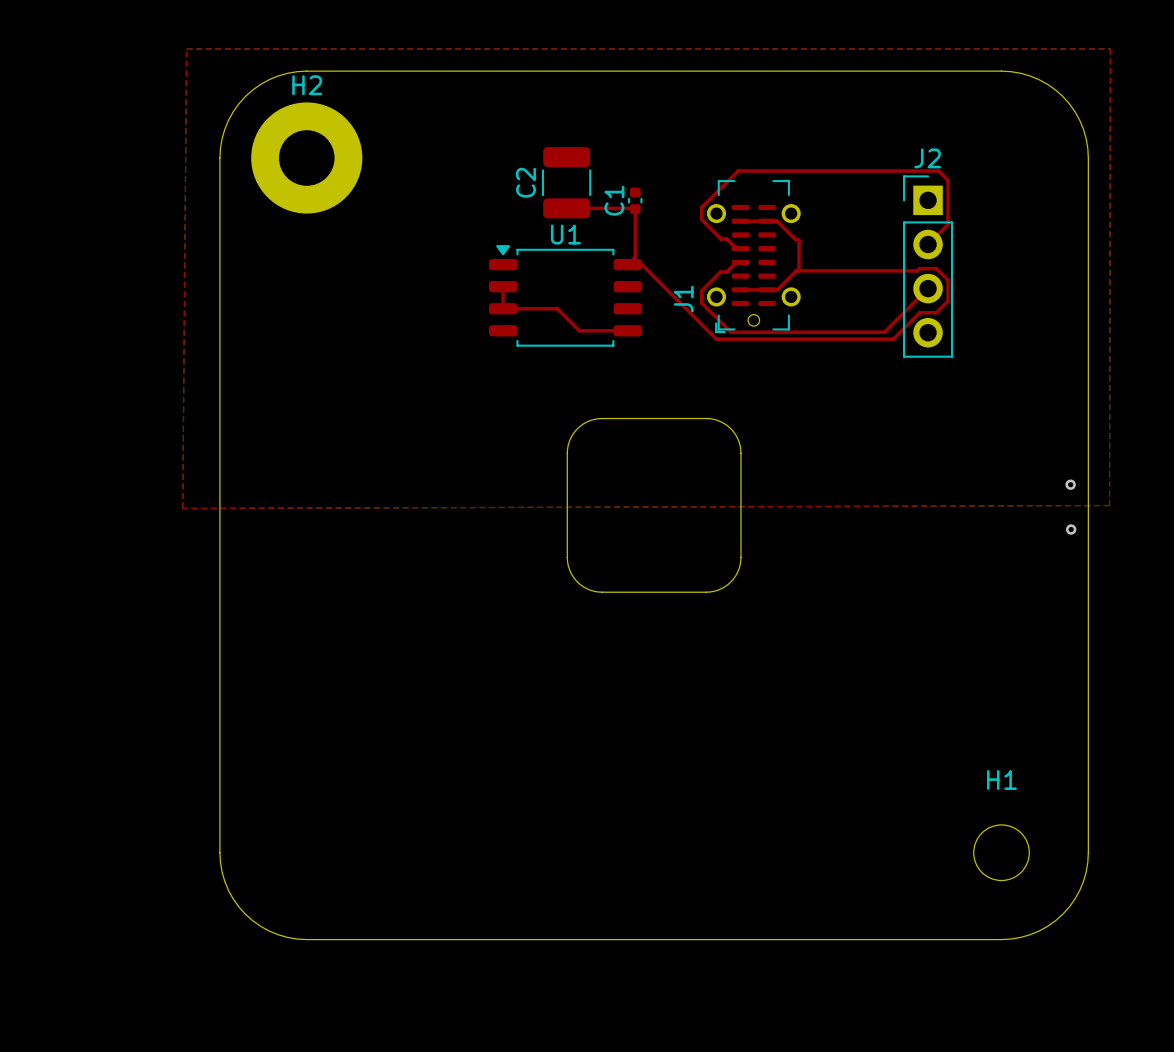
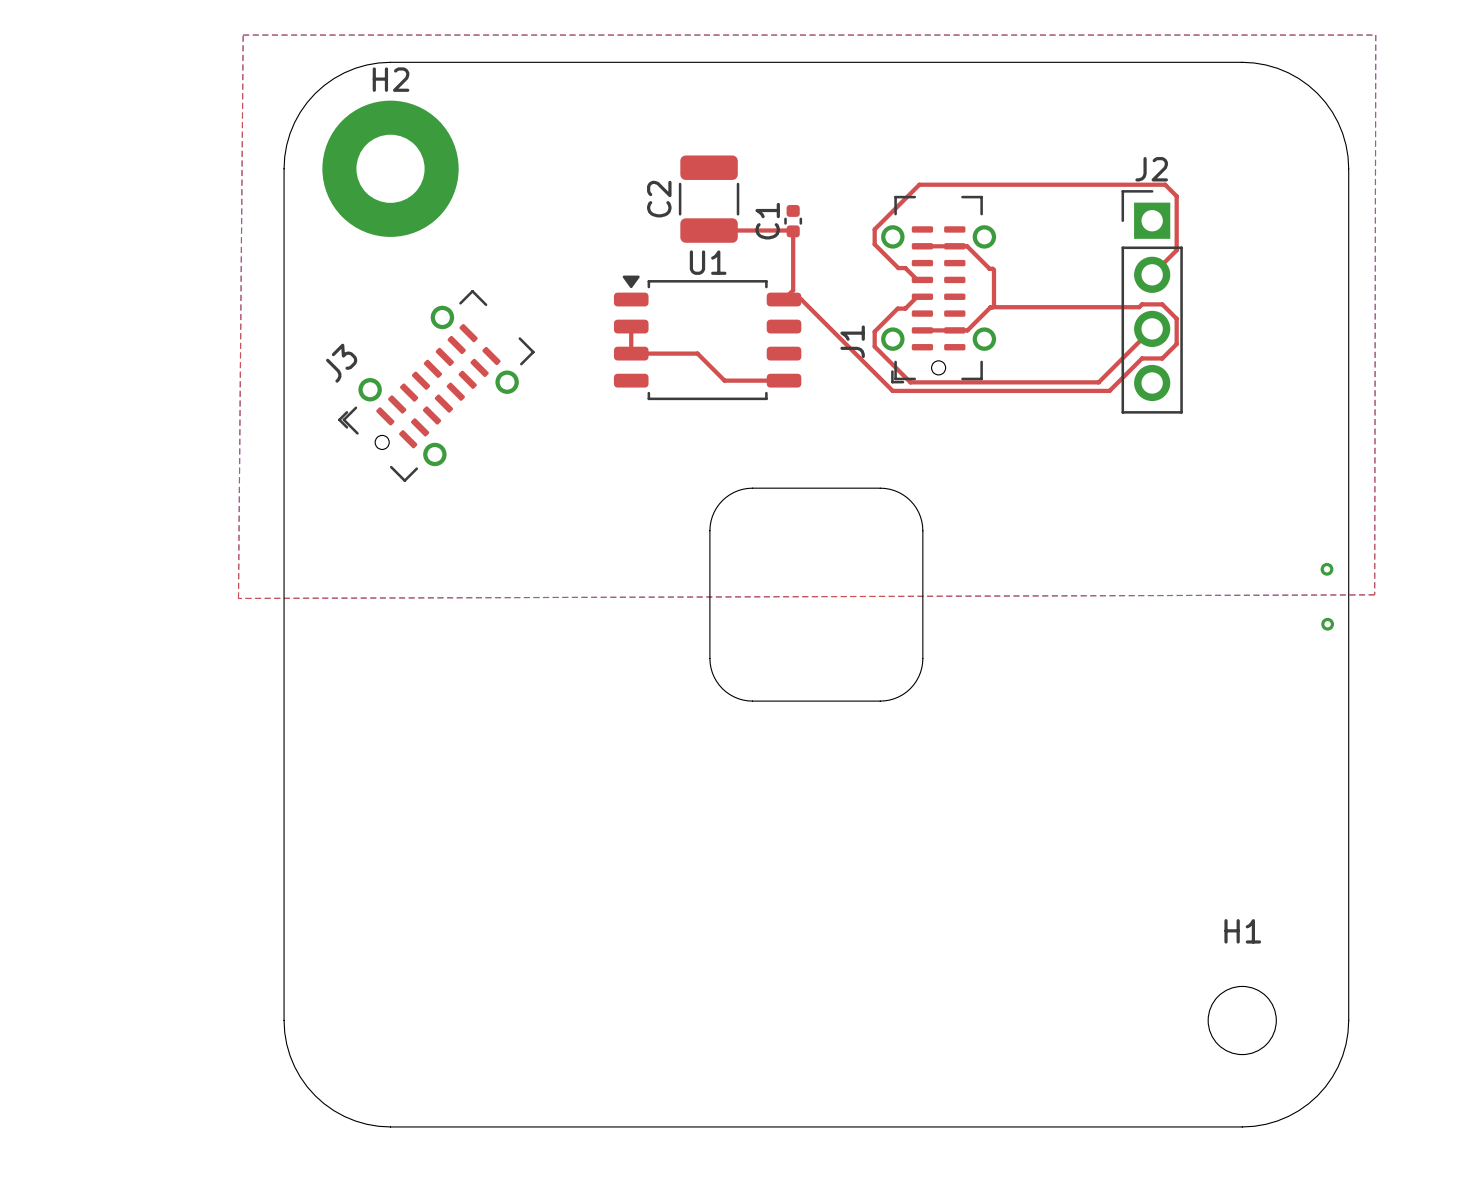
J3: none -> (436, 385)

